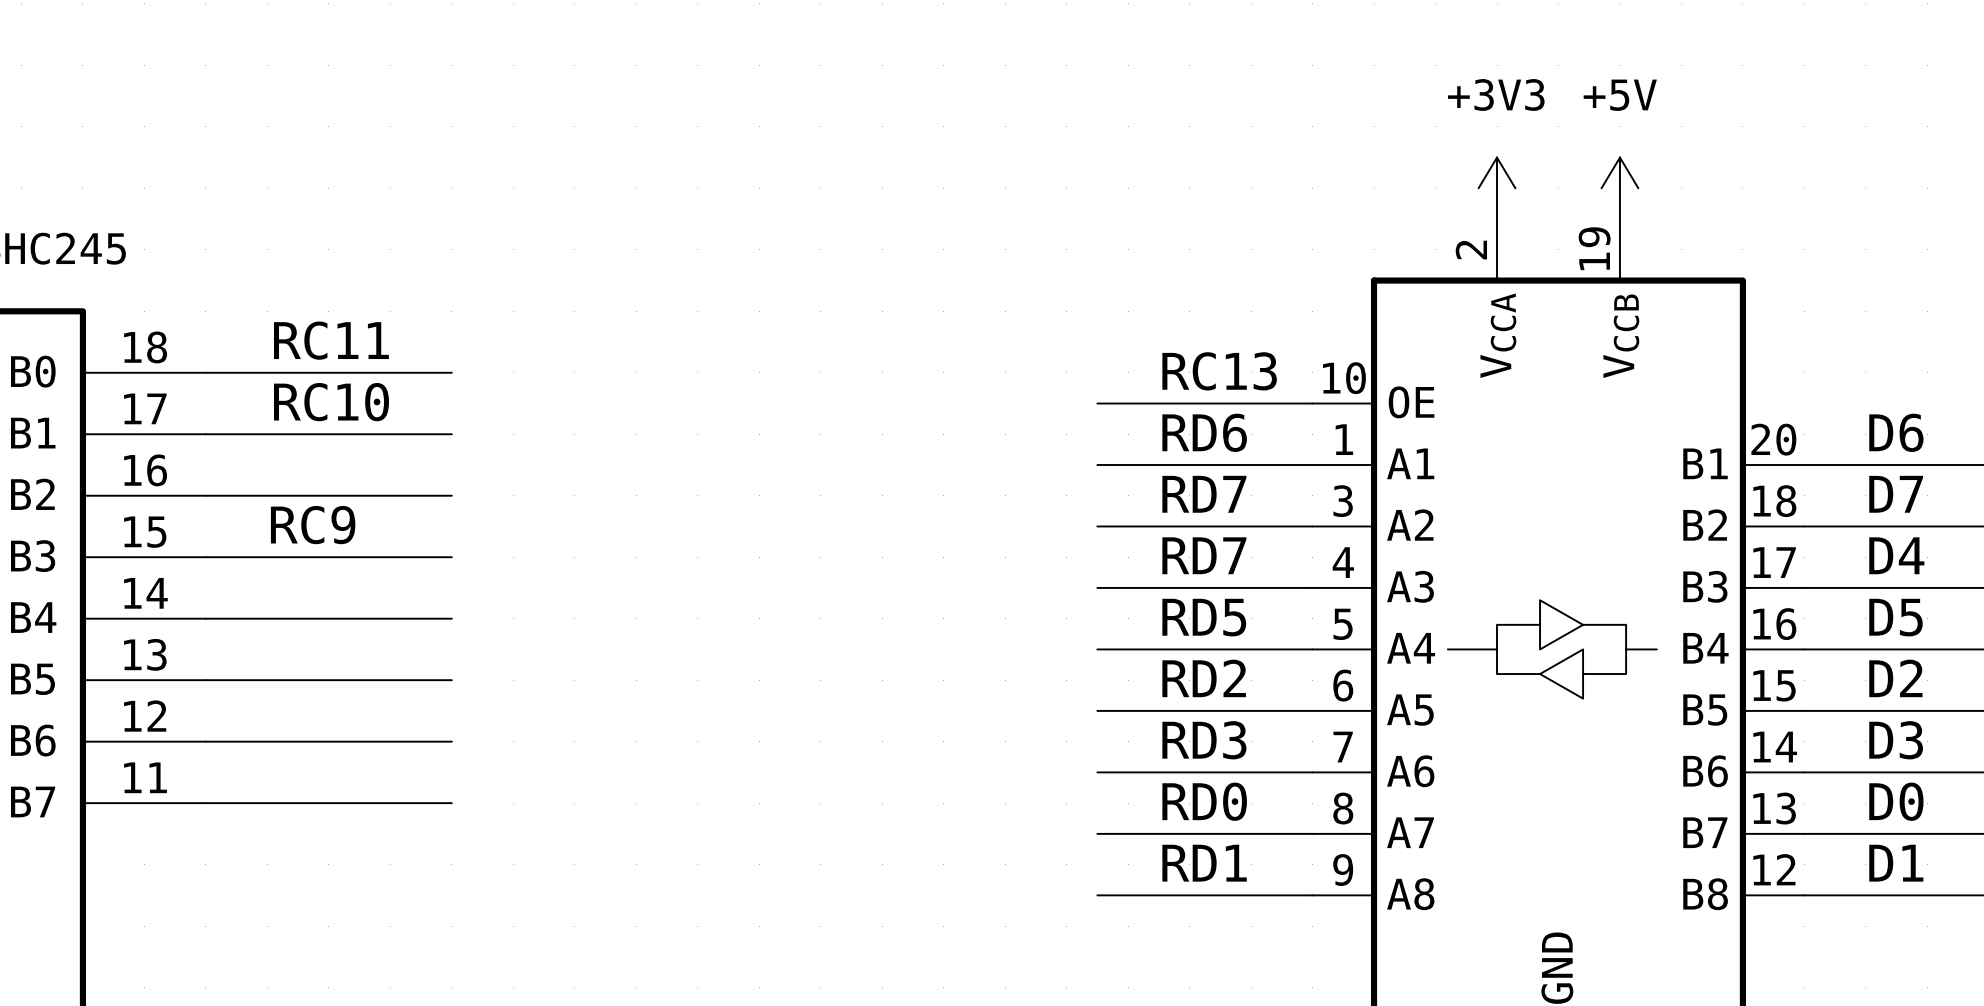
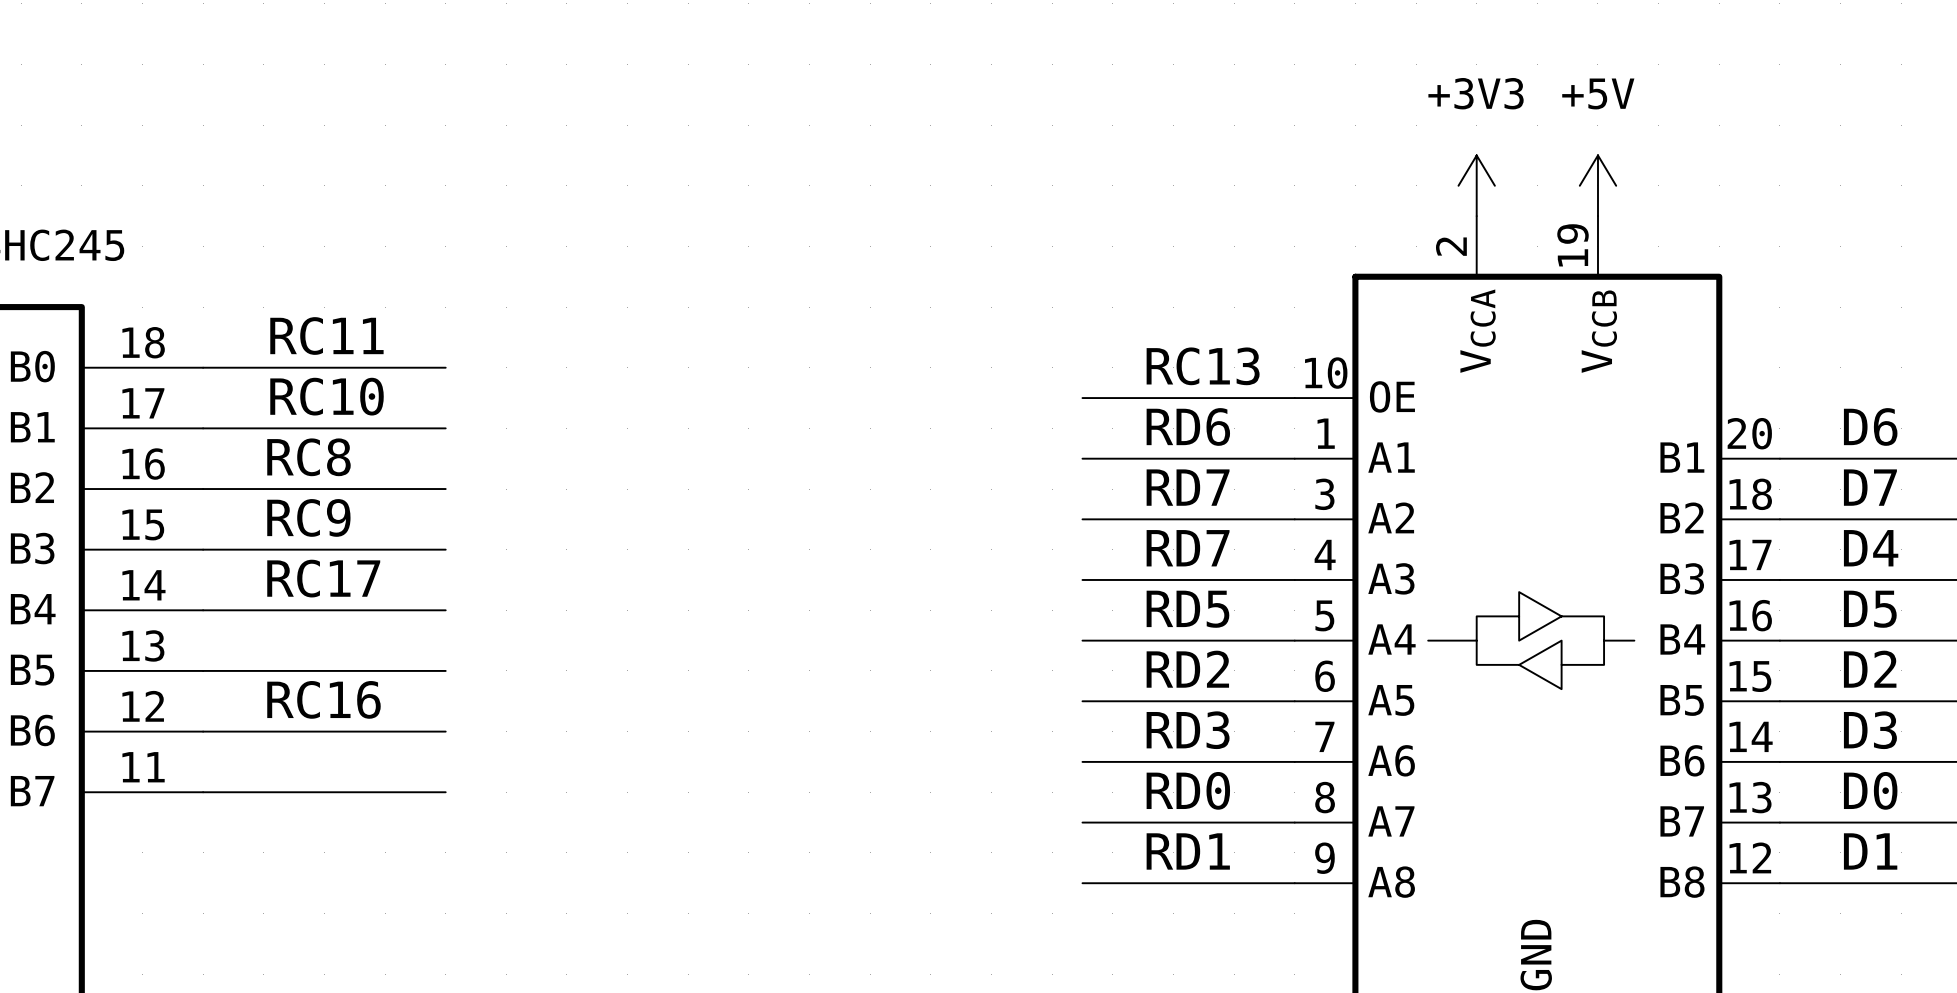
label: none -> RC8 (308, 457)
label: none -> RC17 (323, 578)
label: none -> RC16 (323, 699)

